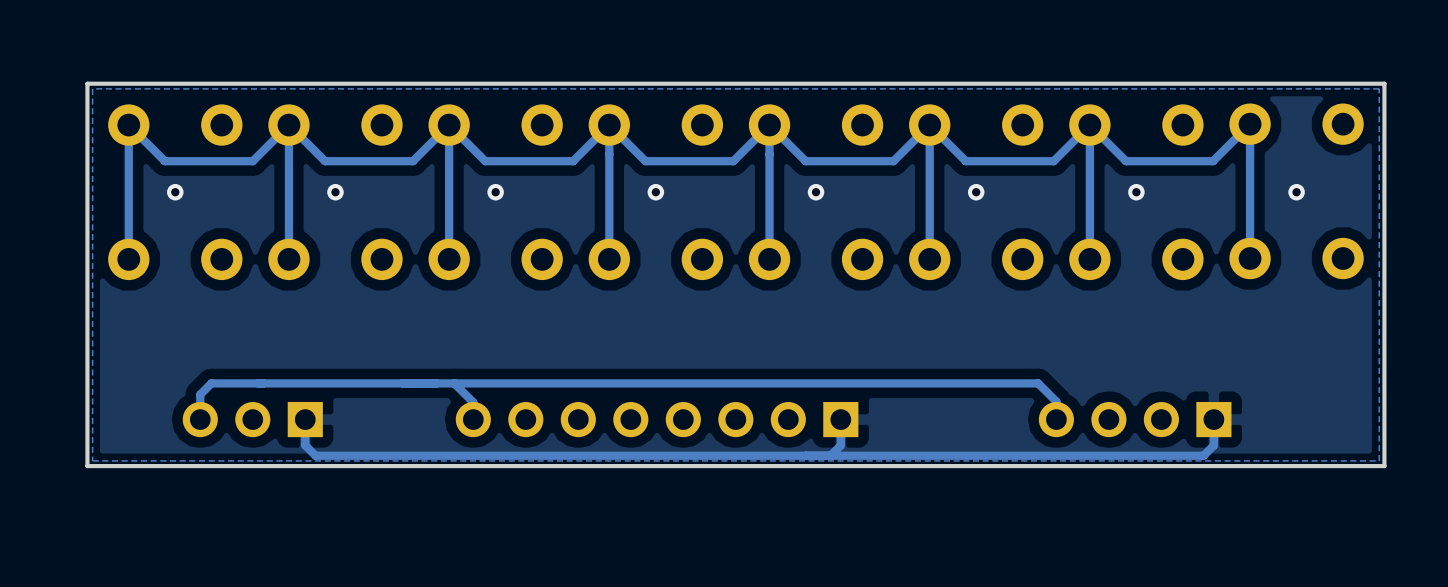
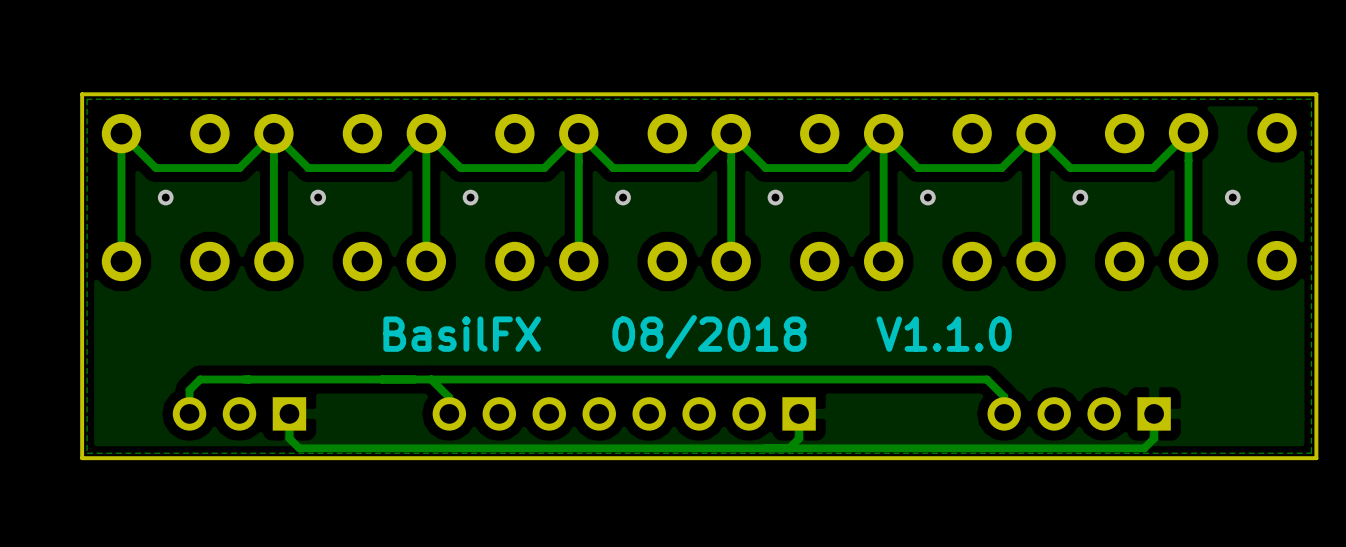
text: none -> BasilFX 08/2018 V1.1.0 (697, 336)

